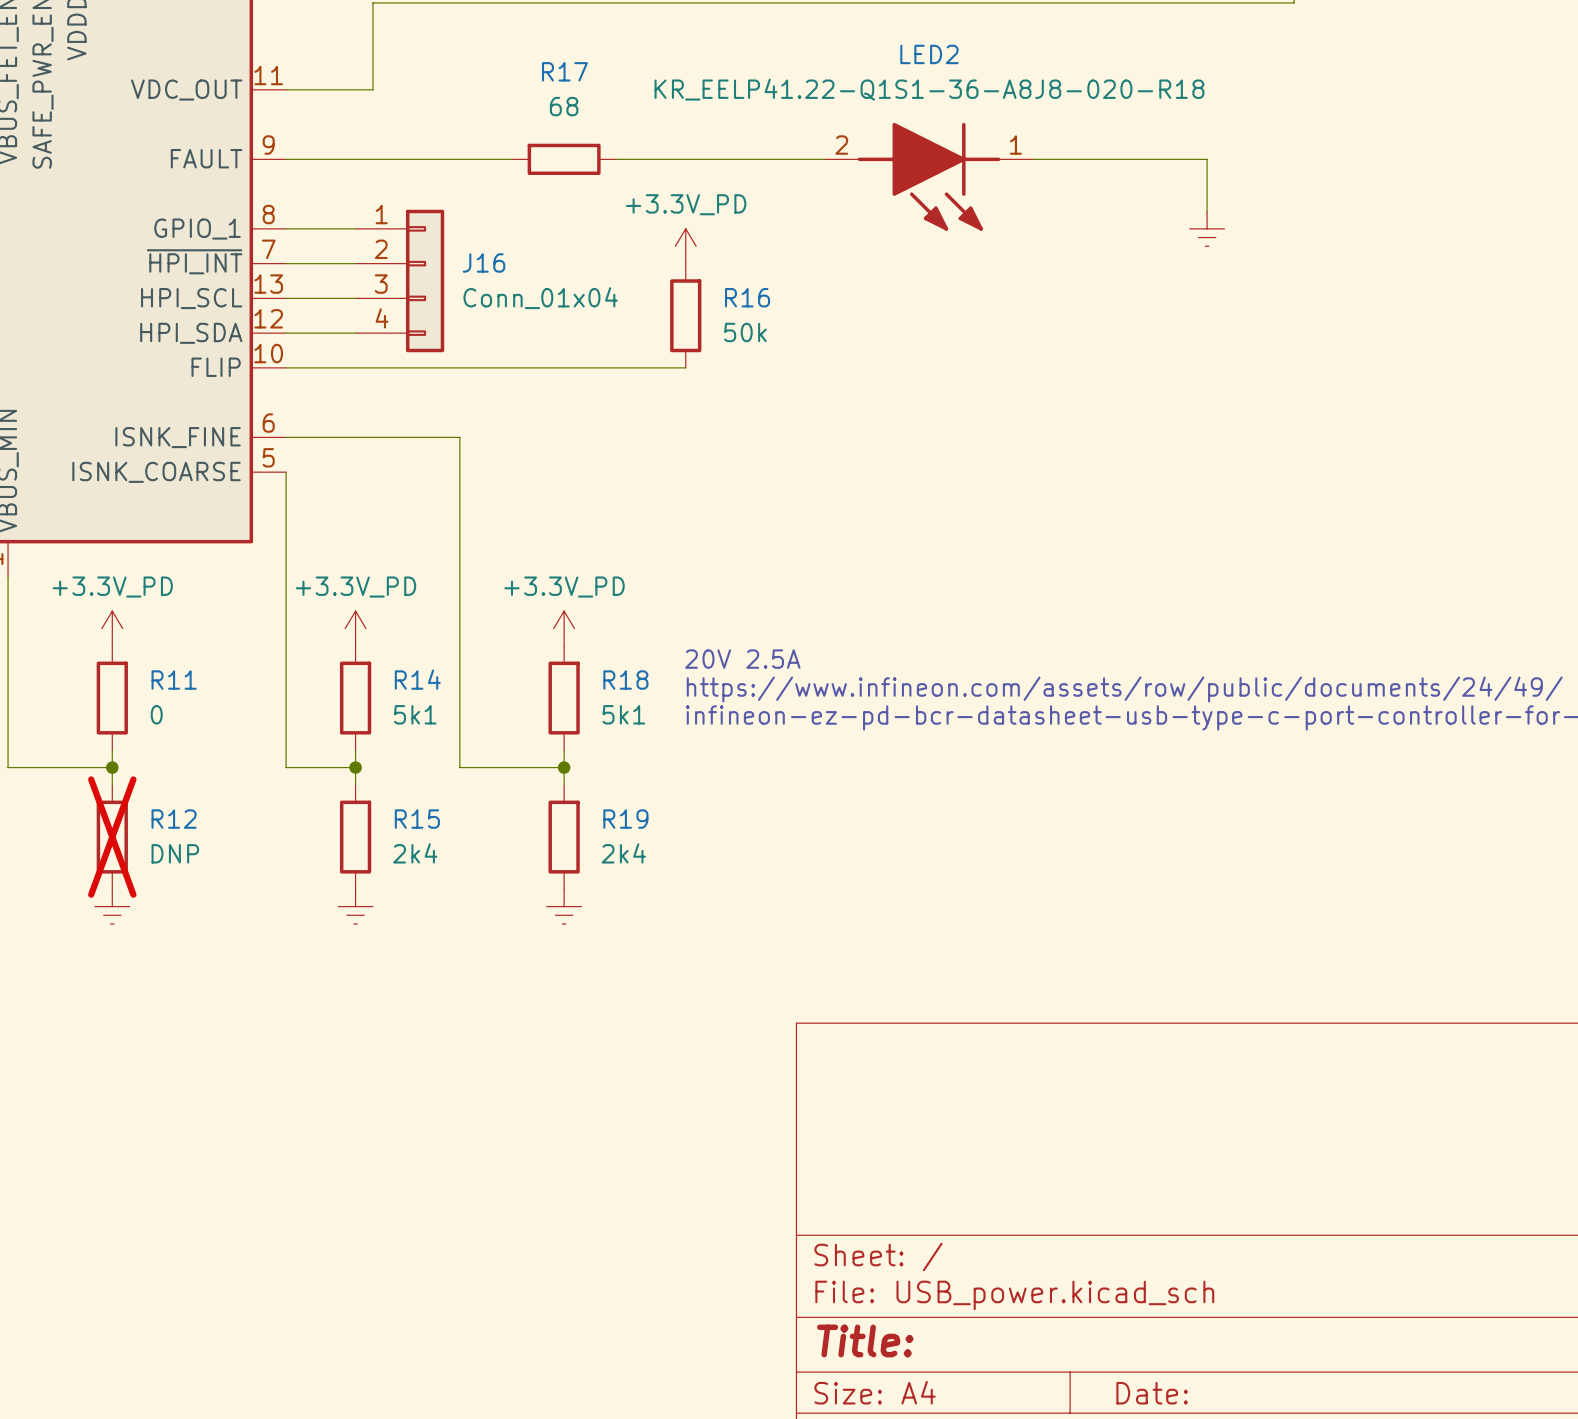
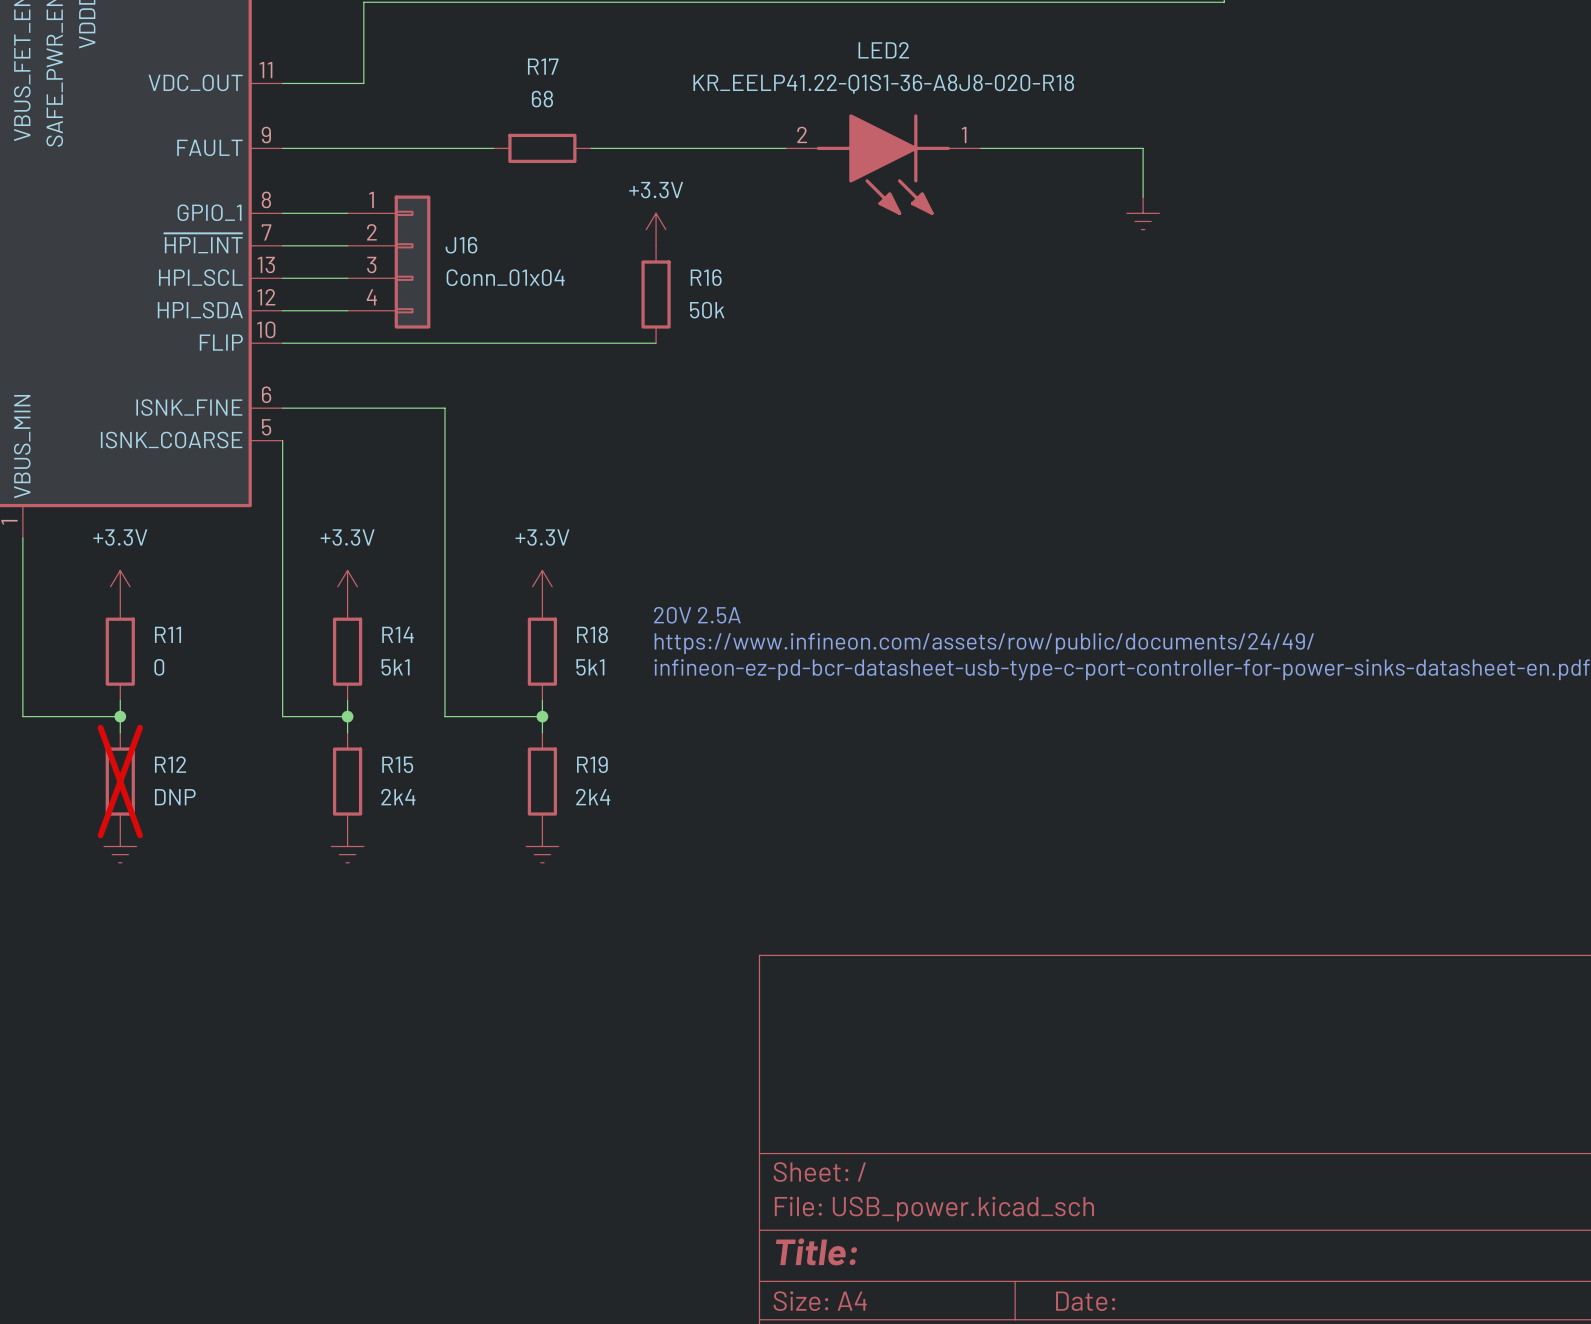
power symbol: +3.3V_PD (685, 246) -> +3.3V (656, 229)
power symbol: +3.3V_PD (112, 628) -> +3.3V (120, 586)
power symbol: +3.3V_PD (355, 628) -> +3.3V (347, 586)
power symbol: +3.3V_PD (564, 628) -> +3.3V (542, 586)

